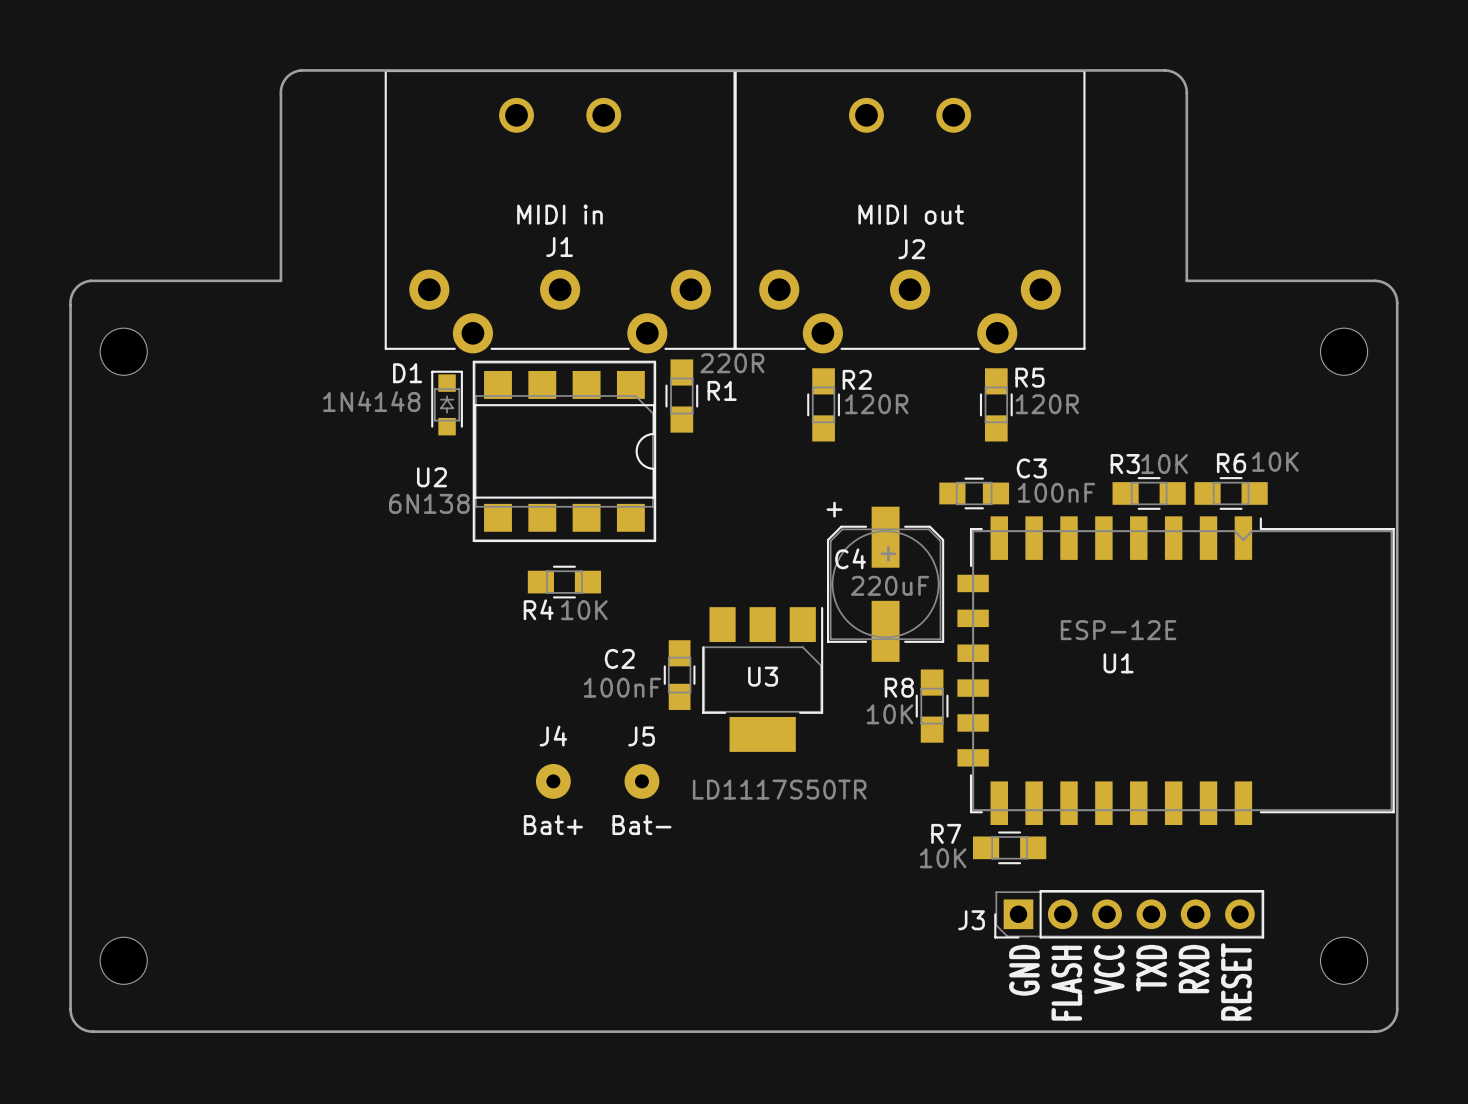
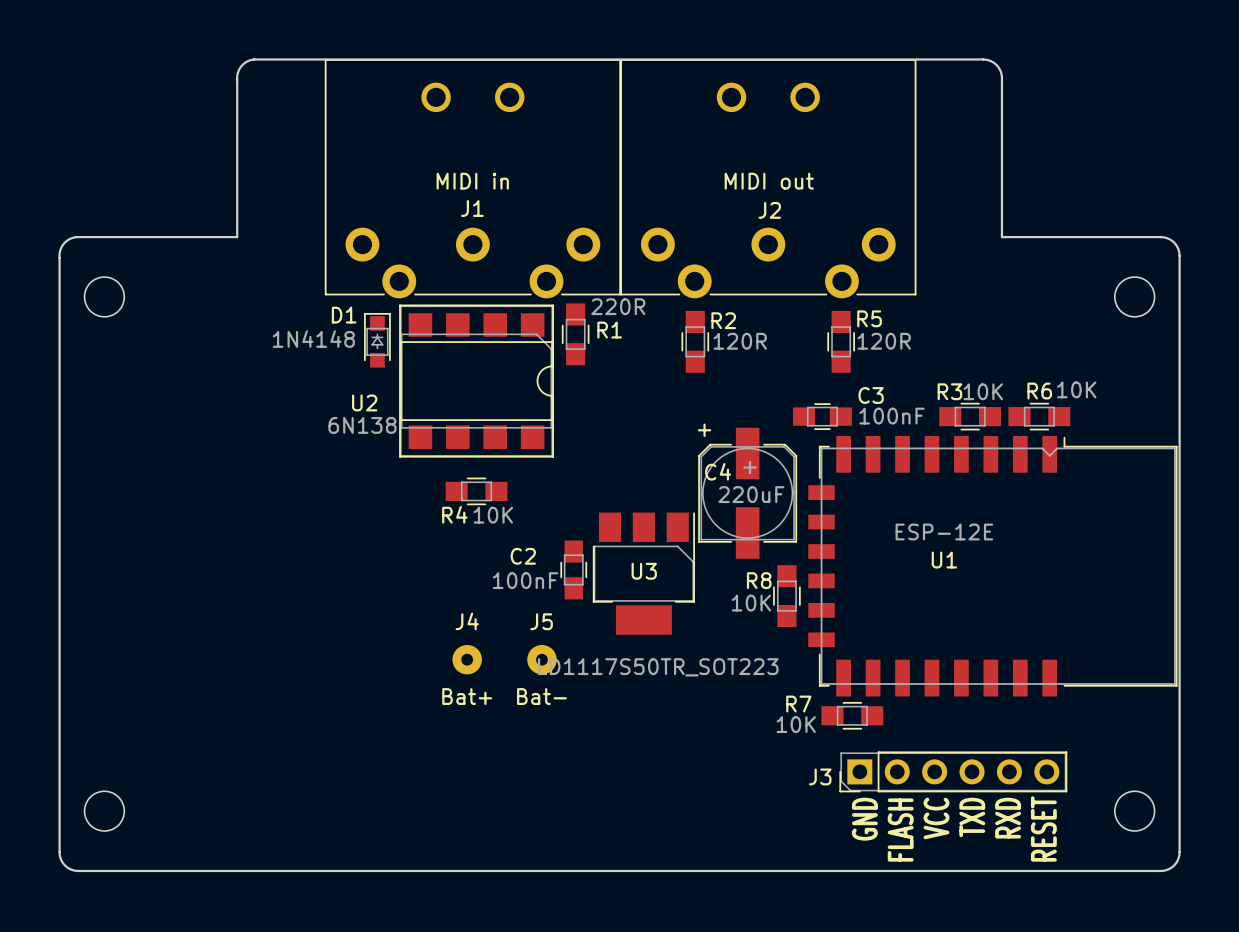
U3 value: LD1117S50TR (779, 789) -> LD1117S50TR_SOT223 (658, 667)

